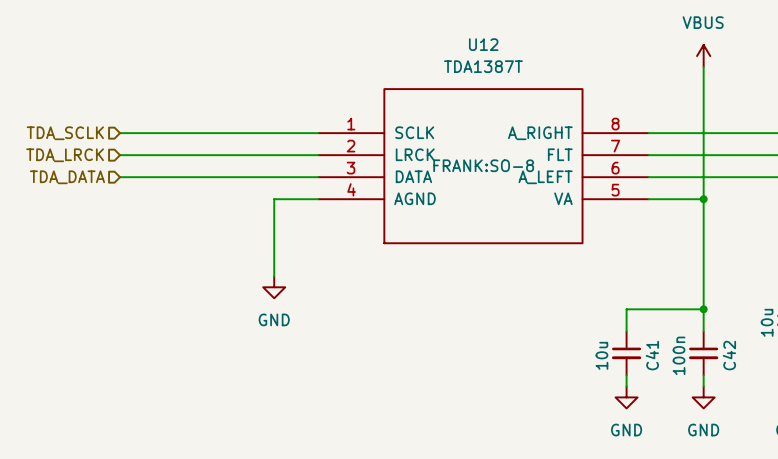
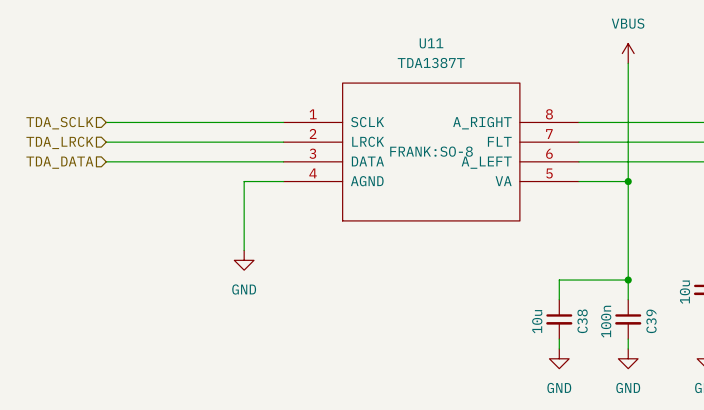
U12 name: U12 (483, 44) -> U11 (431, 43)
C41 name: C41 (652, 355) -> C38 (582, 321)
C42 name: C42 (729, 355) -> C39 (651, 321)

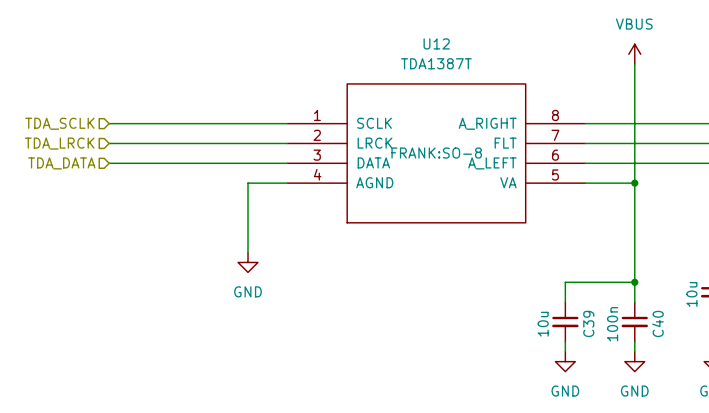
U11 name: U11 (431, 43) -> U12 (436, 43)
C38 name: C38 (582, 321) -> C39 (588, 323)
C39 name: C39 (651, 321) -> C40 (657, 323)

